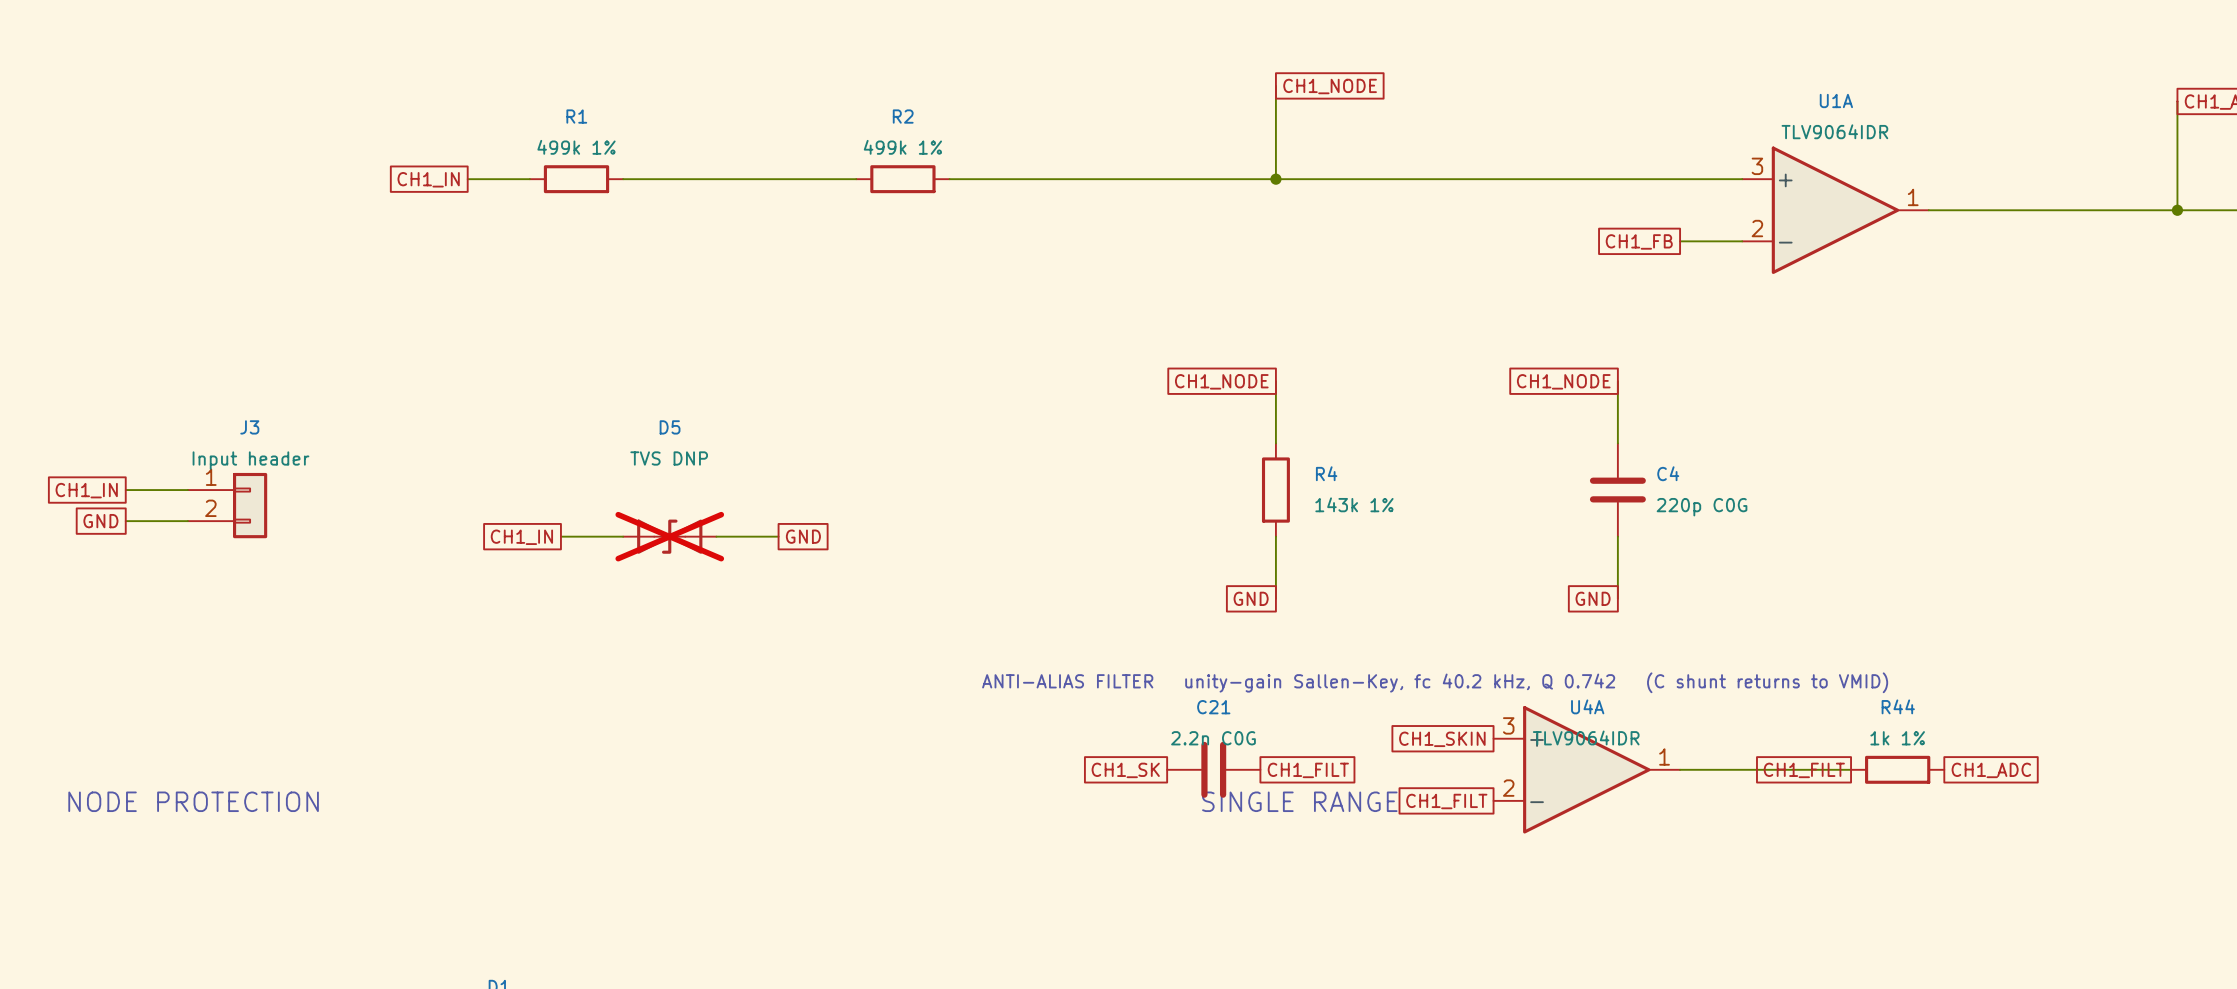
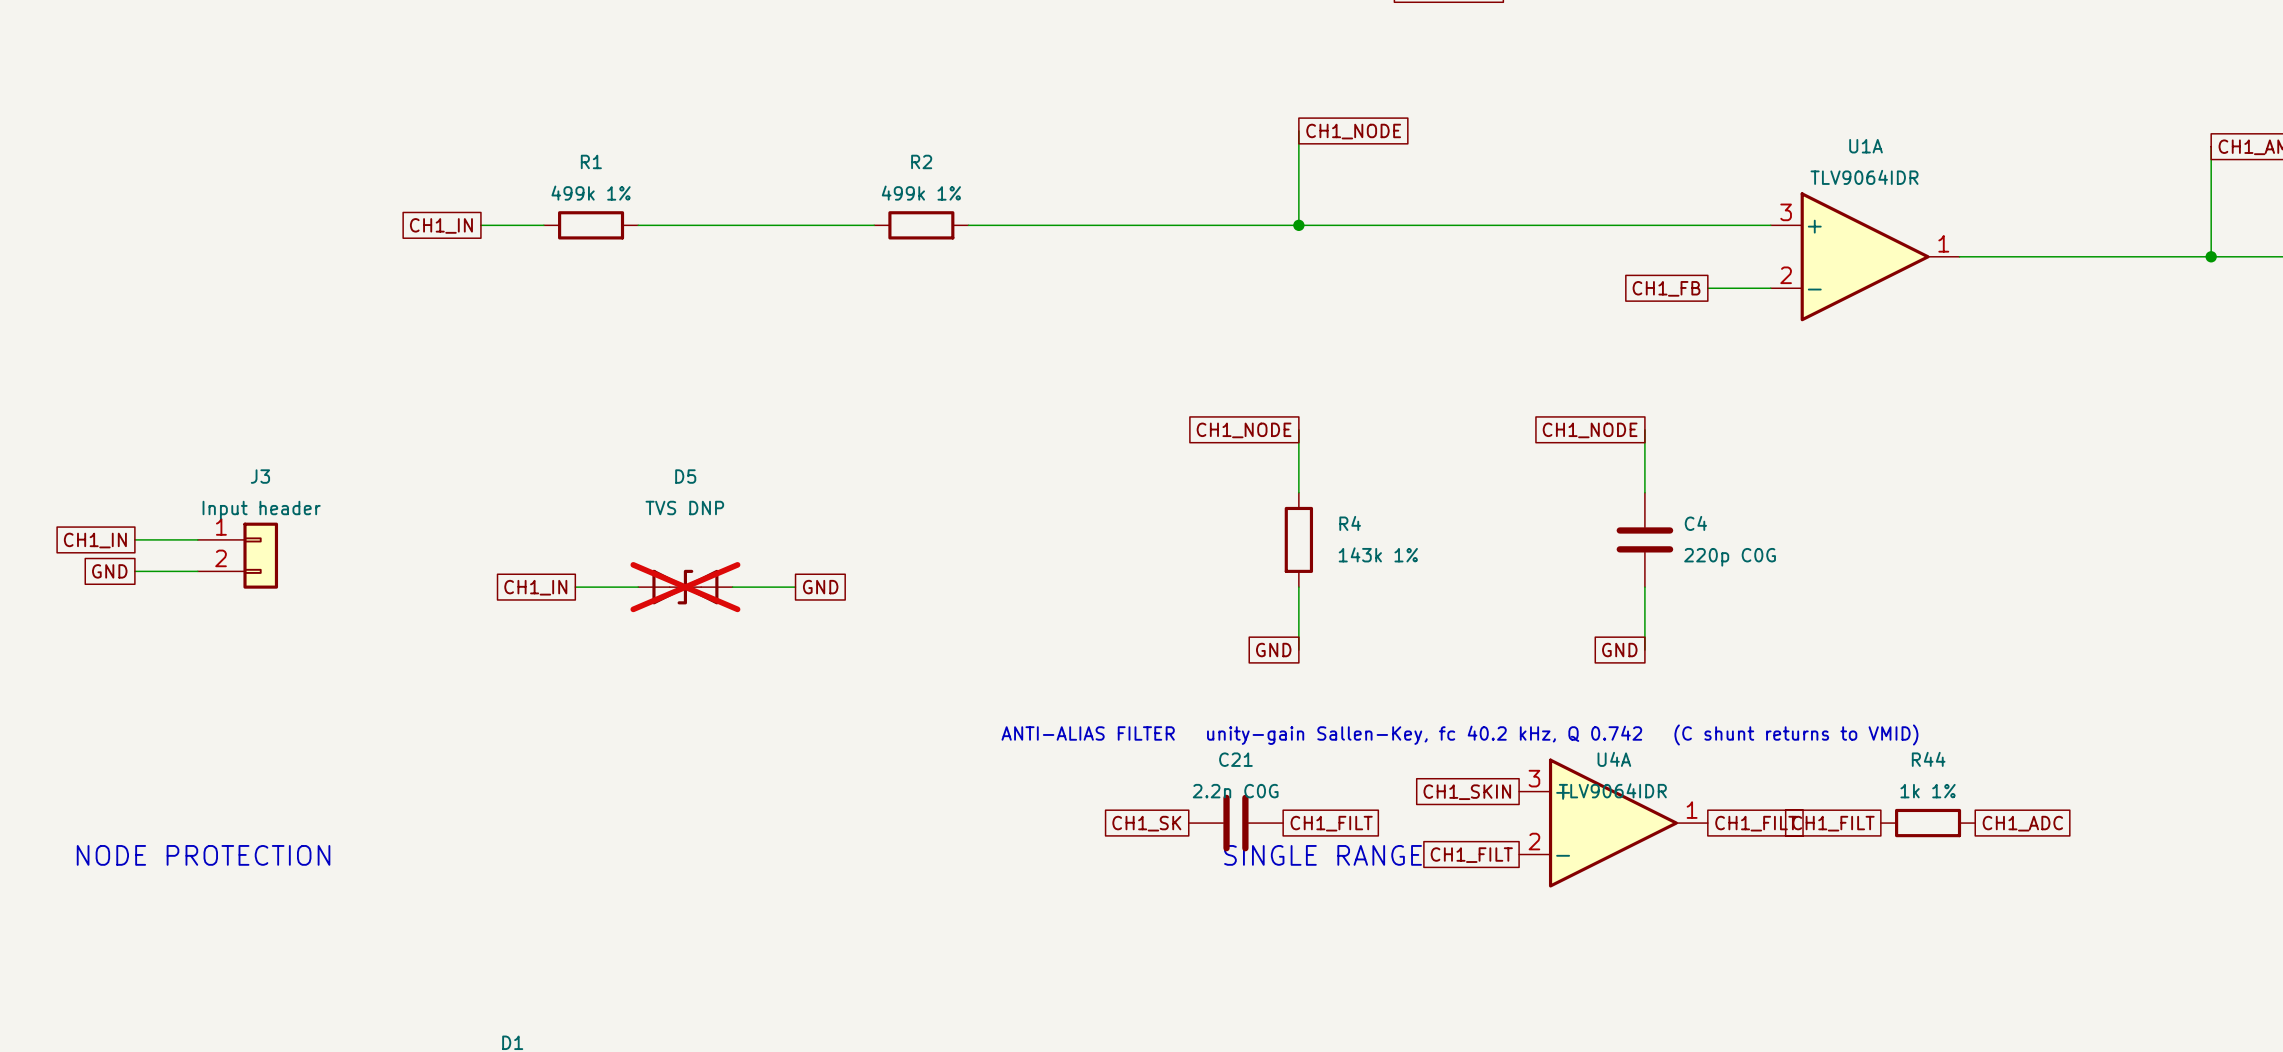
wire: (1680, 769) (1851, 769) -> none
global label: none -> CH1_FILT (1756, 823)

